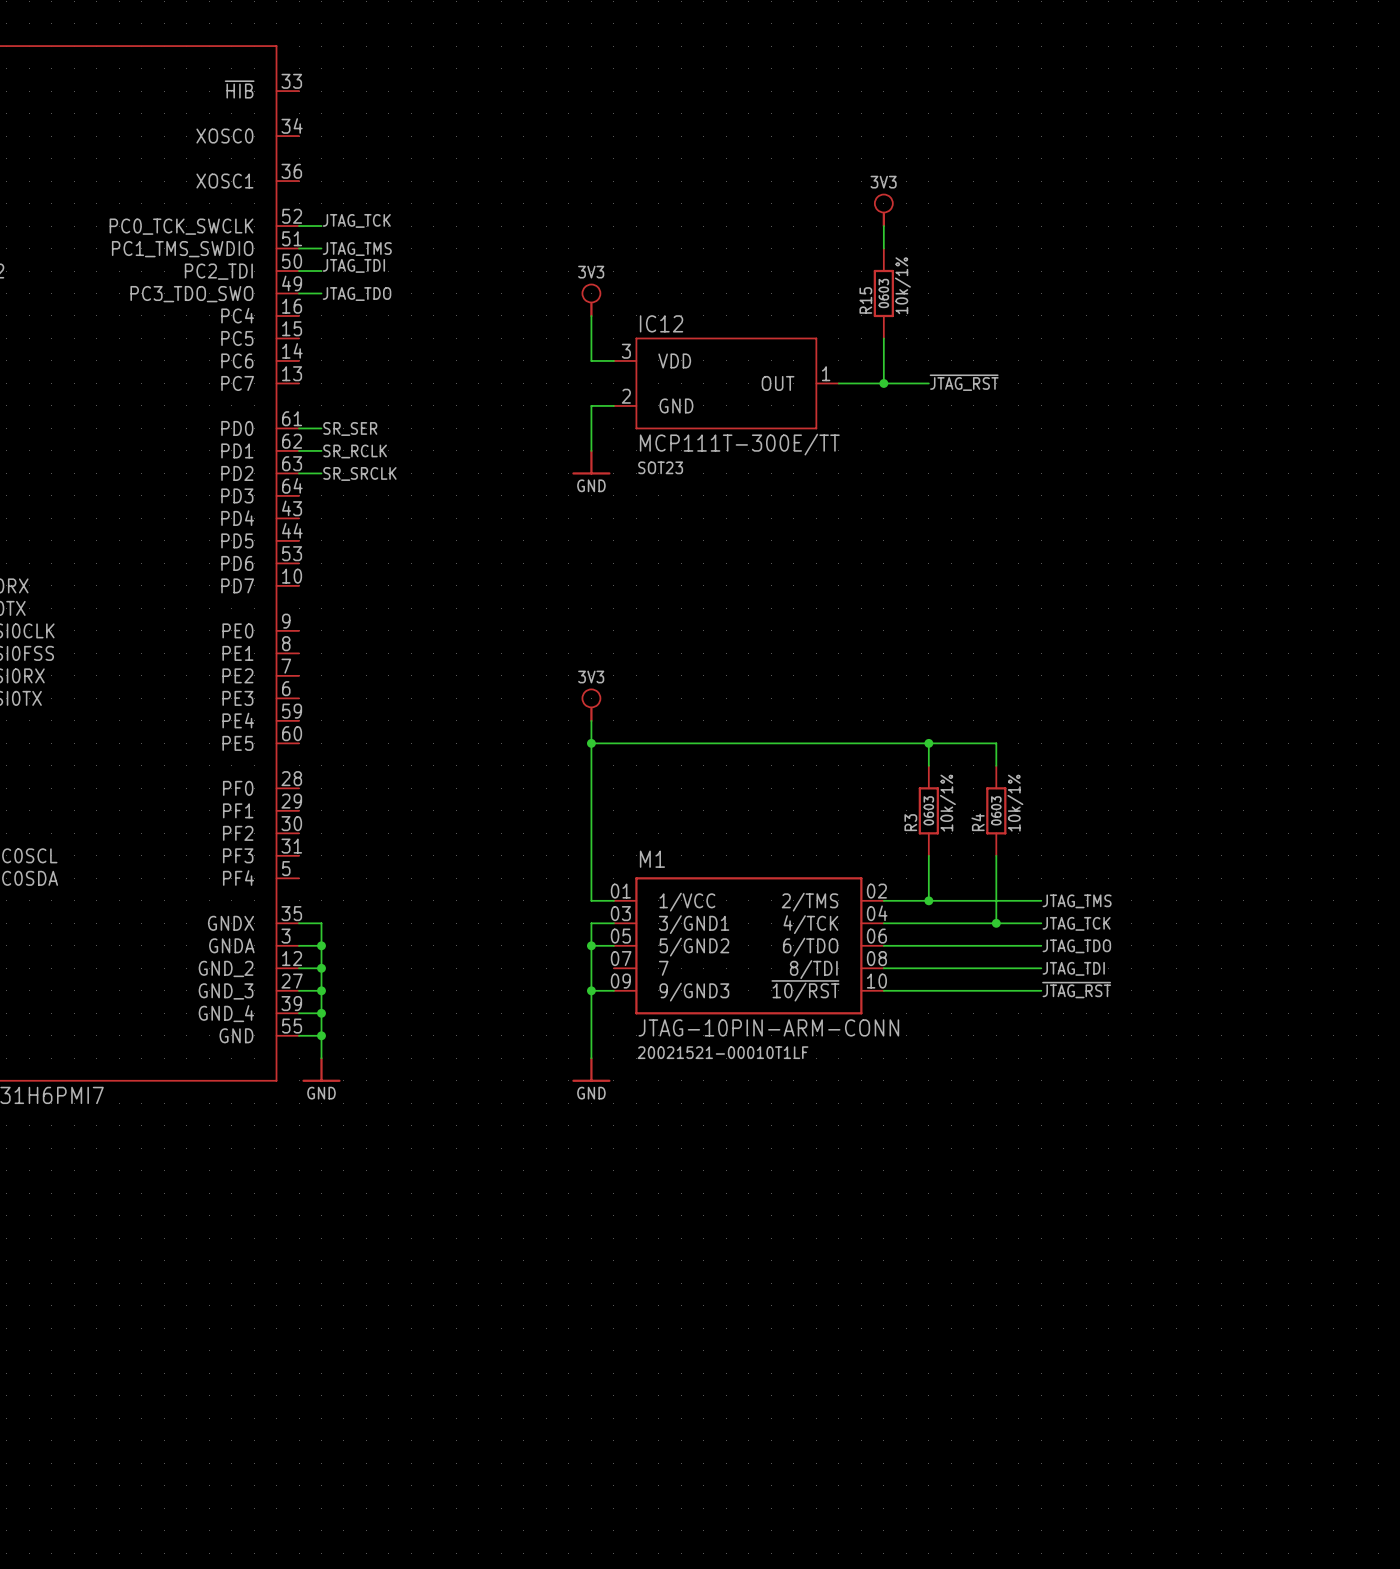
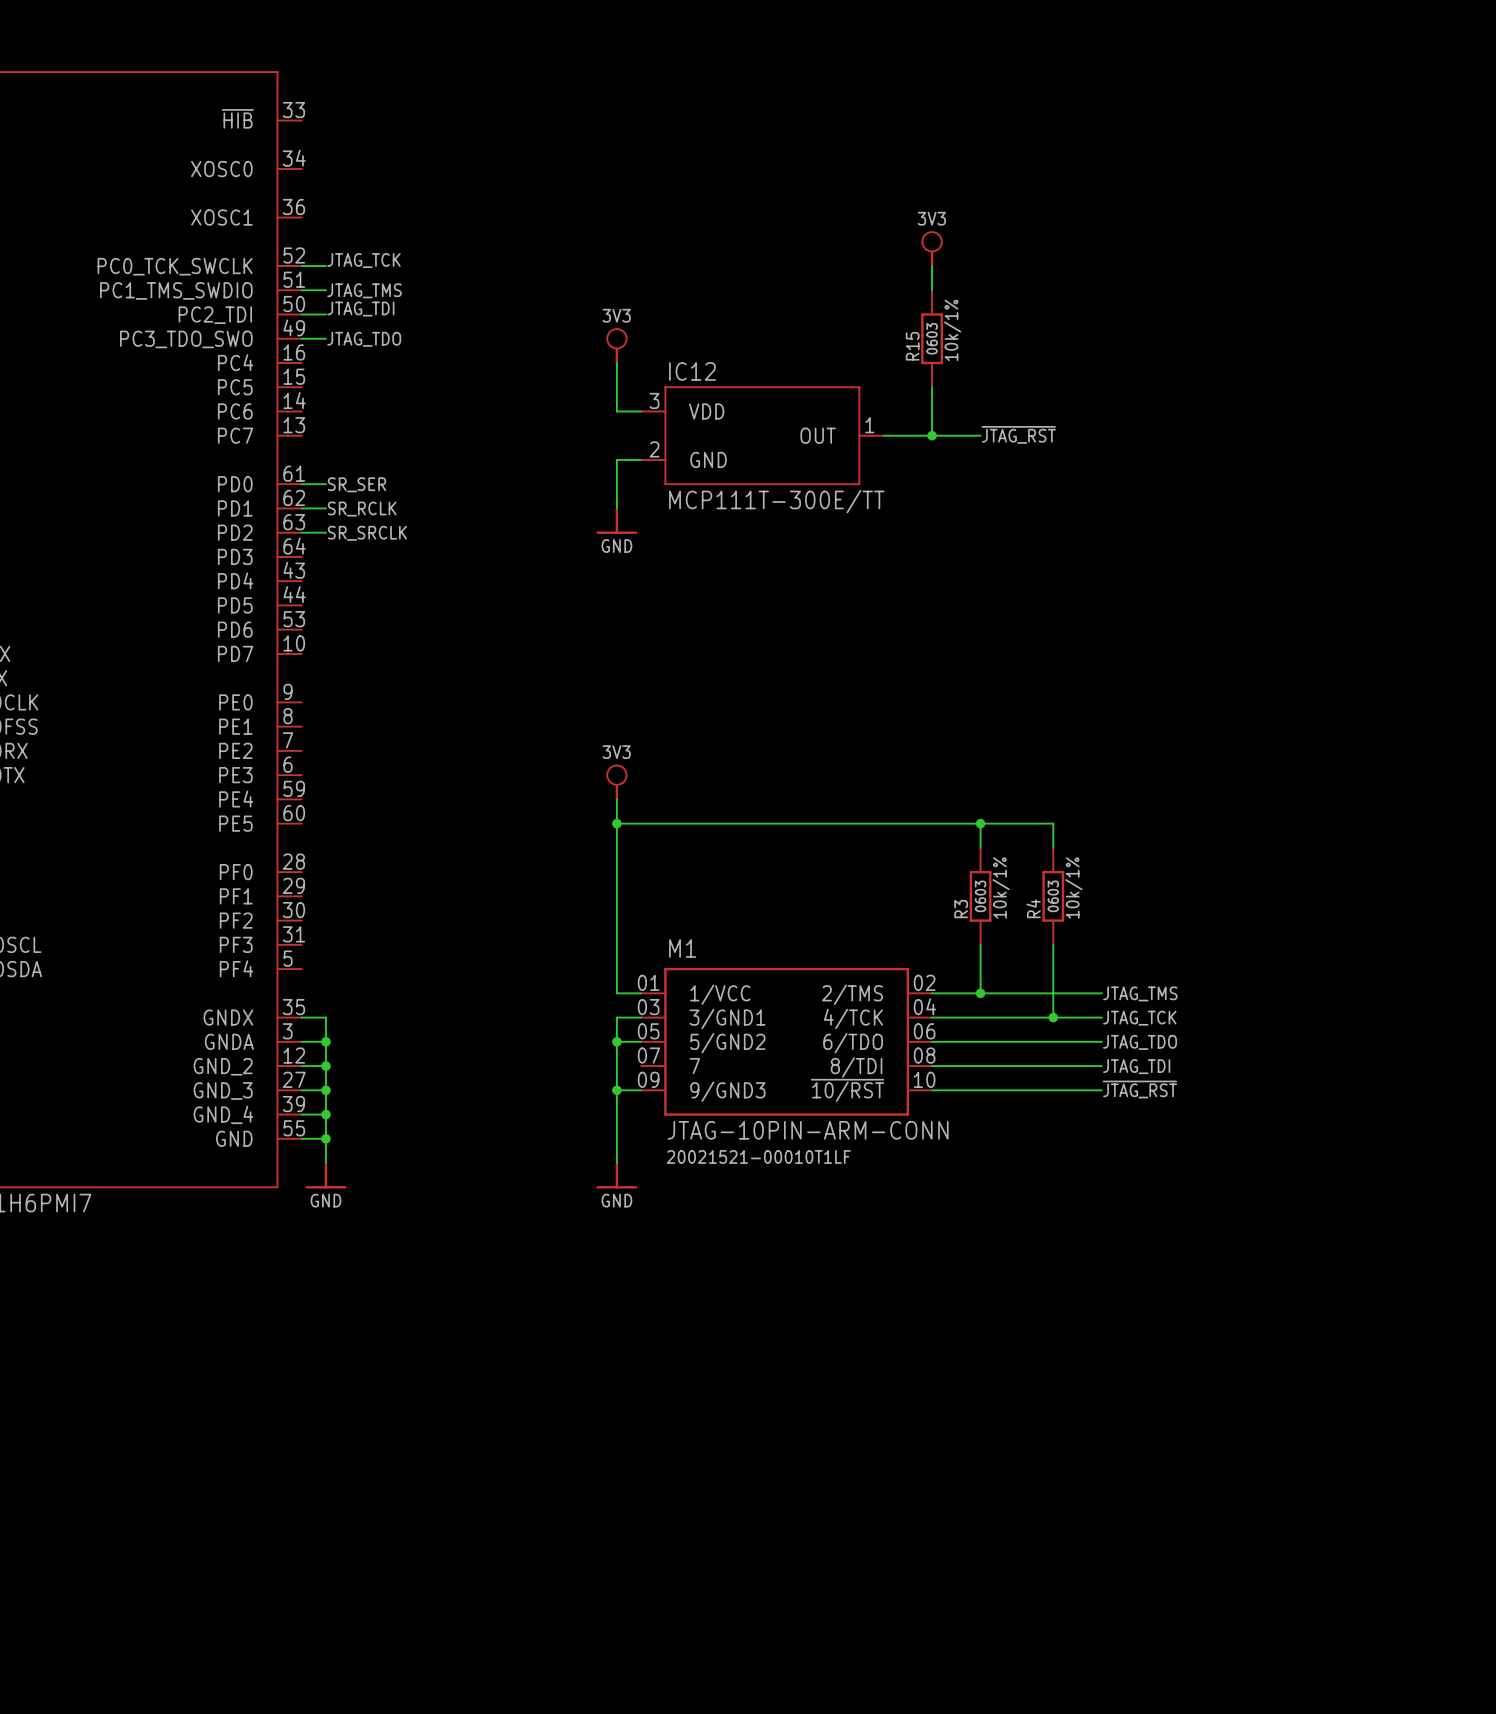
IC12 text: SOT23 (660, 467) -> none

